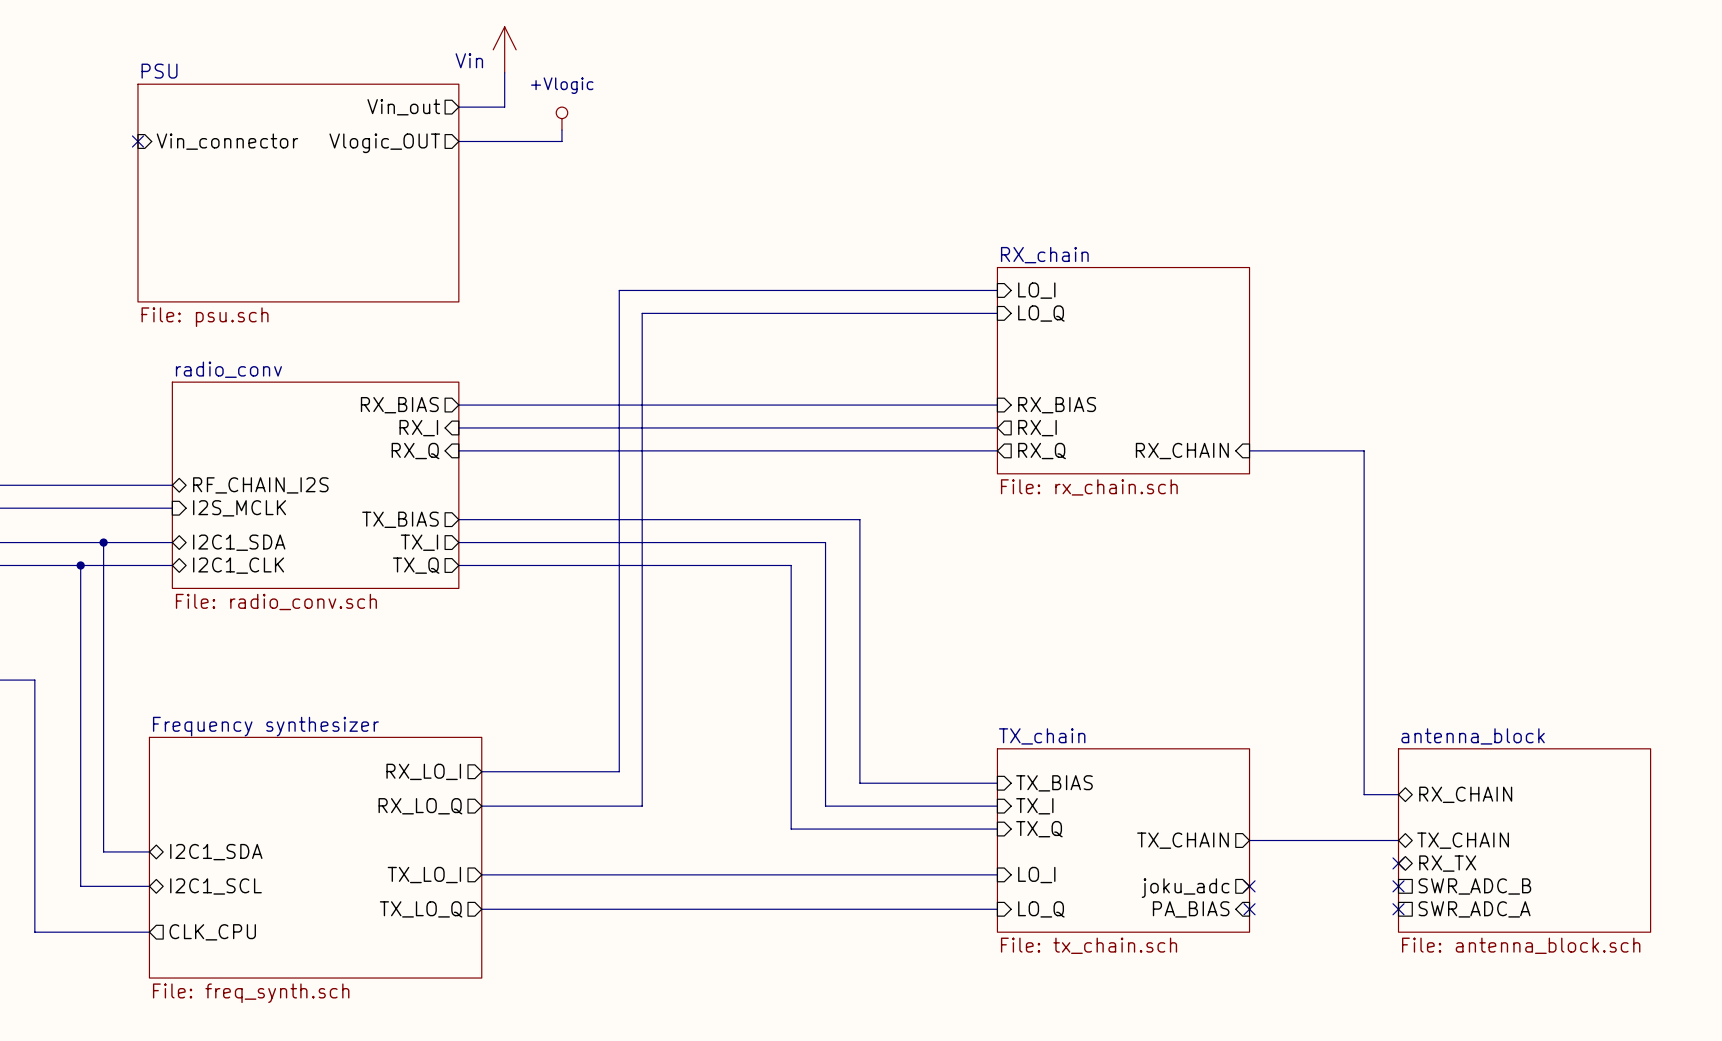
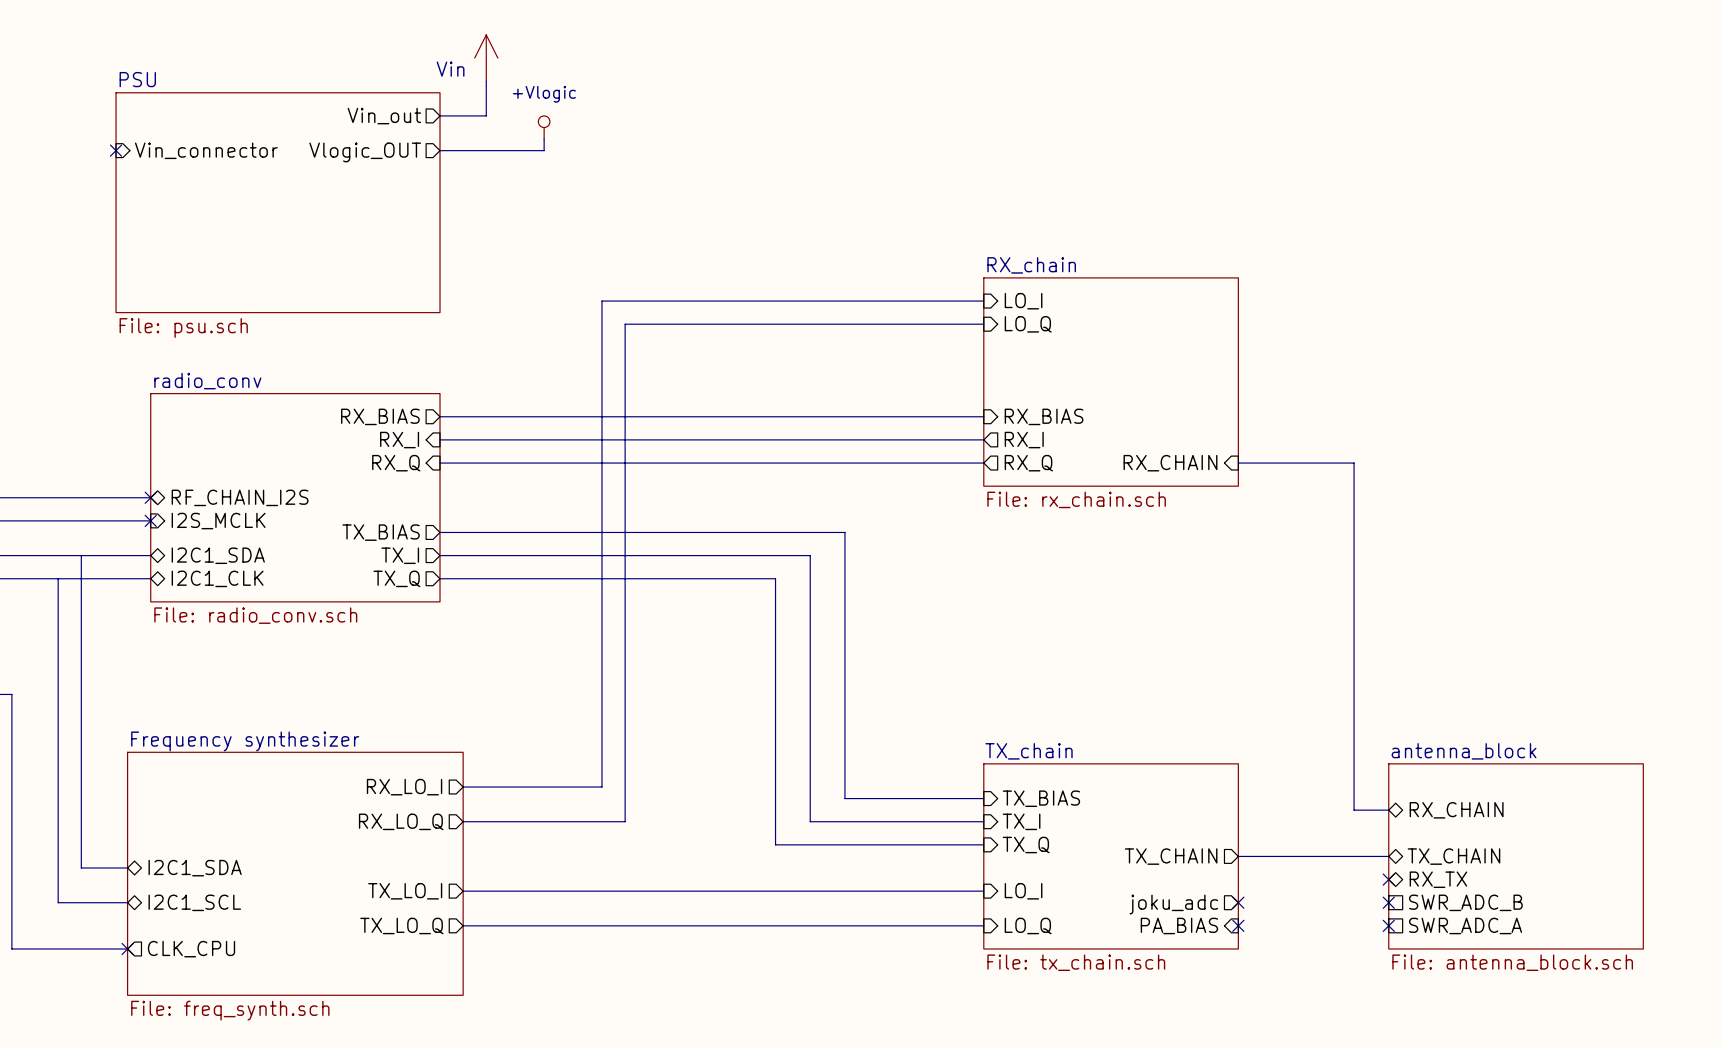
no-connect mark: none -> (150, 497)
no-connect mark: none -> (150, 520)
junction: (103, 542) -> none
junction: (80, 565) -> none
no-connect mark: none -> (127, 948)

